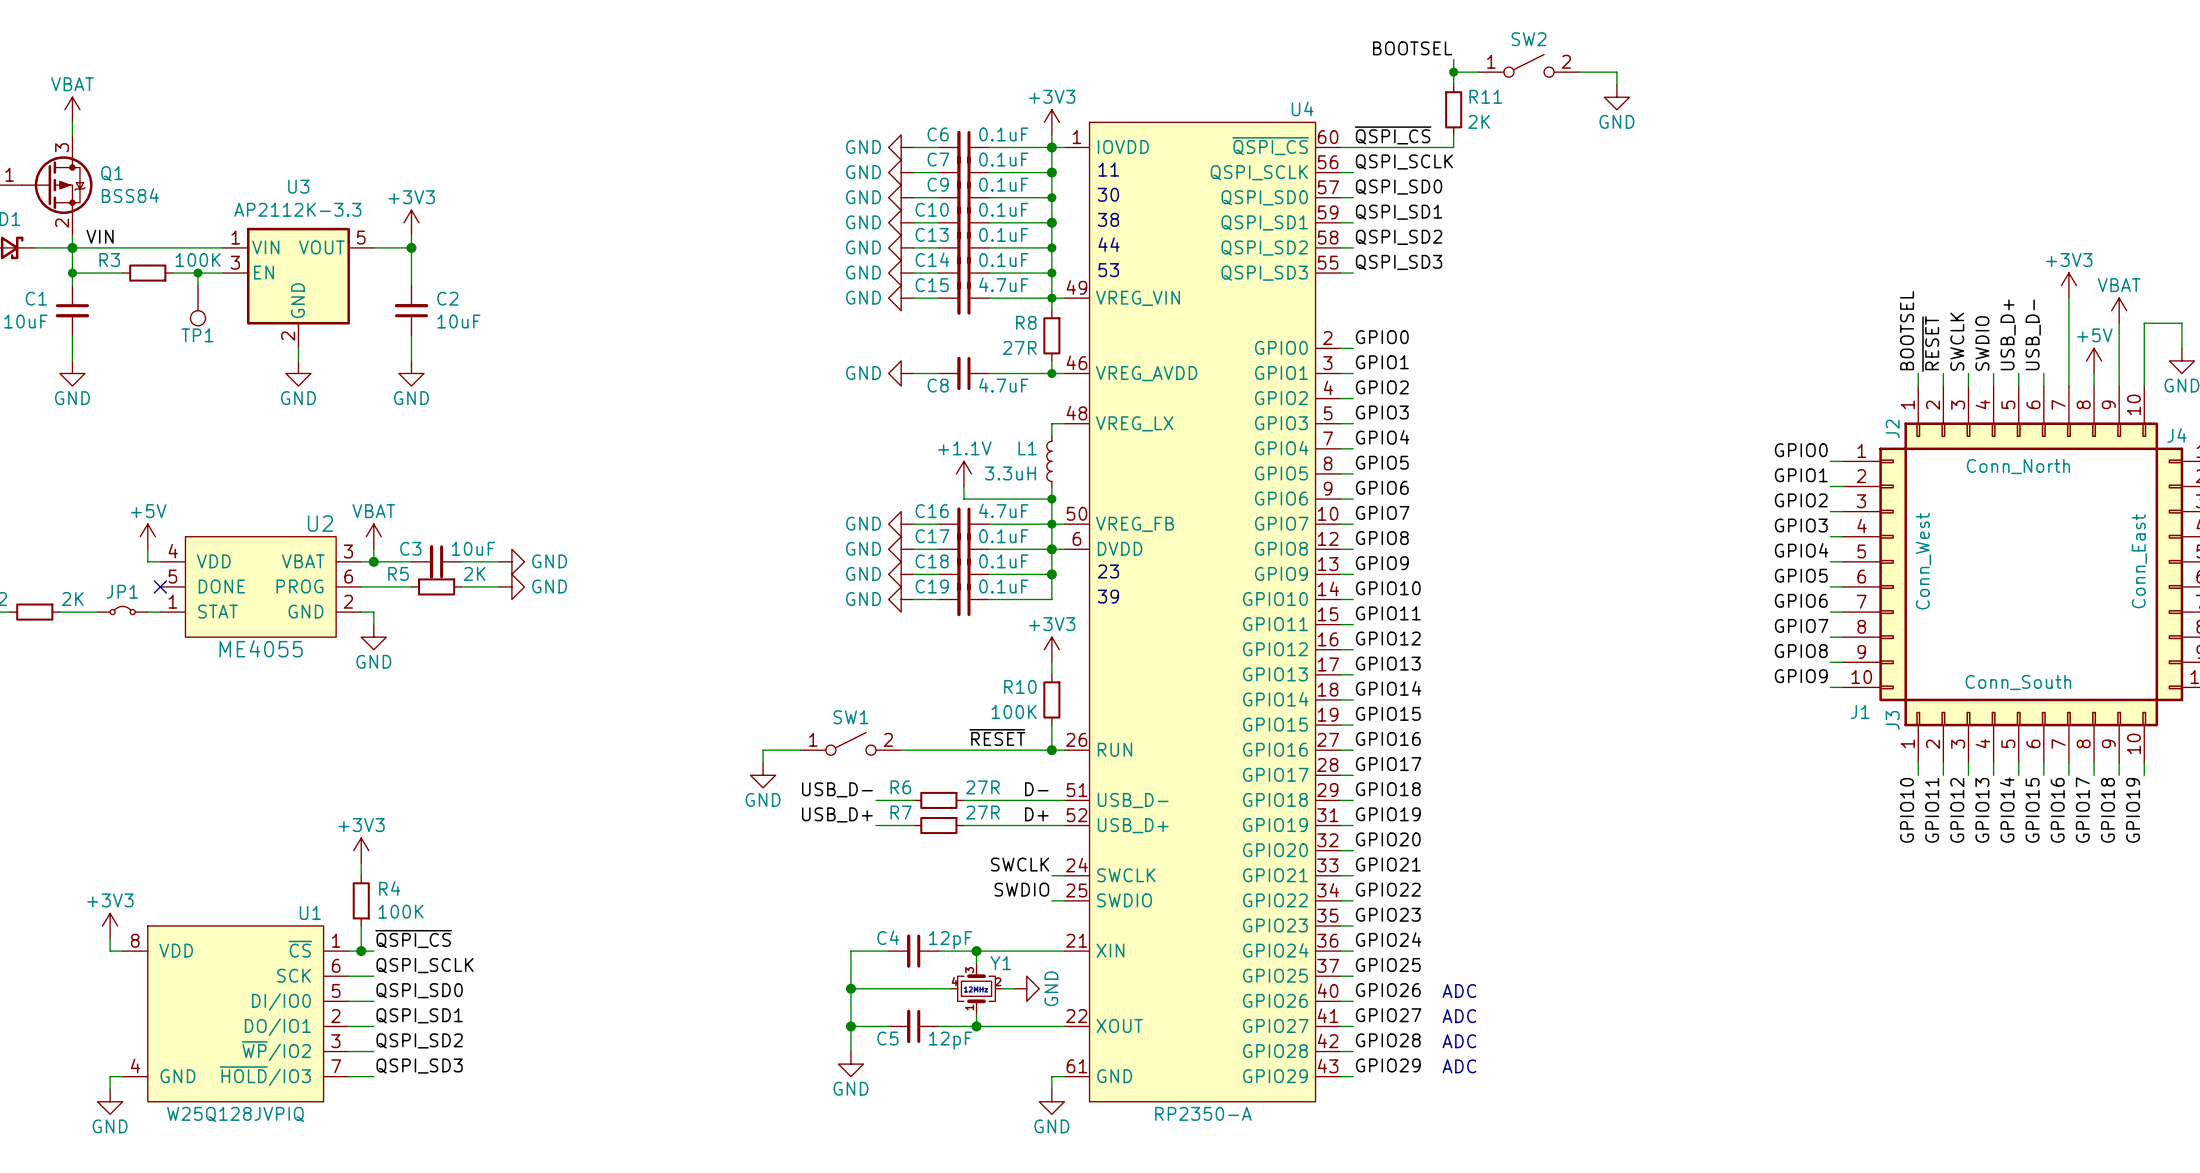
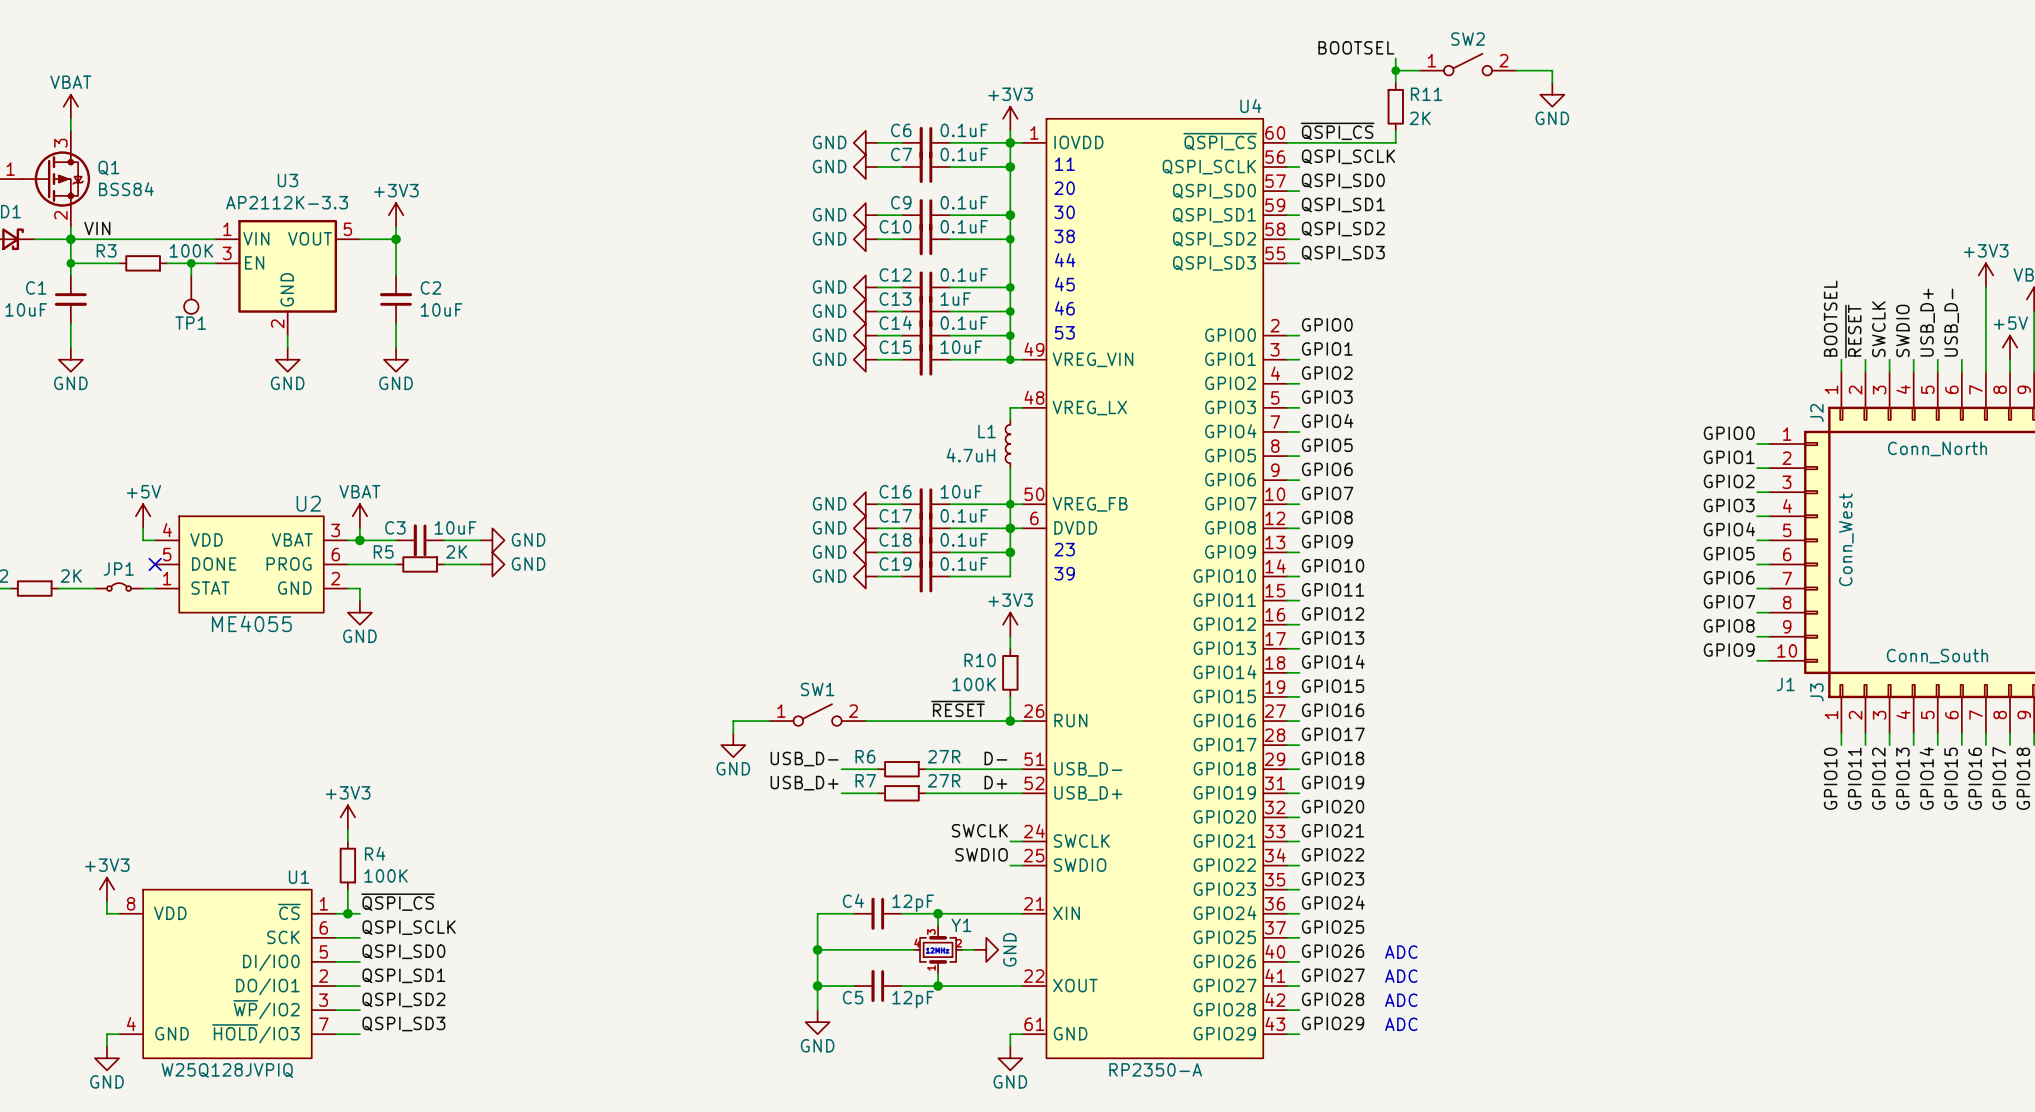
U4 symbol: [1064, 122, 1341, 1102] -> [1022, 118, 1288, 1059]
text: 30 (1108, 194) -> 20 (1064, 188)
power symbol: GND (901, 197) -> none
wire: (913, 197) (938, 197) -> (877, 335) (901, 335)
C9: 0.1uF (963, 197) -> none
wire: (989, 197) (1051, 197) -> (950, 335) (1010, 335)
junction: (1051, 197) -> none
C10 name: C10 (932, 209) -> C9 (901, 202)
text: 38 (1108, 219) -> 30 (1064, 212)
C13 name: C13 (932, 234) -> C10 (895, 226)
text: 44 (1109, 244) -> 38 (1064, 236)
text: 53 (1108, 270) -> 44 (1065, 260)
power symbol: GND (901, 273) -> none
wire: (913, 273) (938, 273) -> (877, 311) (901, 311)
C14 position: (963, 273) -> (926, 335)
wire: (989, 273) (1051, 273) -> (950, 311) (1010, 311)
junction: (1051, 273) -> none
C15 value: 4.7uF (1003, 284) -> 0.1uF (964, 274)
C15 name: C15 (932, 285) -> C12 (895, 274)
text: none -> 45 (1064, 284)
wire: (1051, 298) (1064, 298) -> none
wire: none -> (1010, 299) (1010, 347)
text: none -> 46 (1064, 308)
power symbol: none -> GND (865, 311)
C13: none -> 1uF (926, 311)
junction: none -> (1010, 311)
R8: 27R (1051, 335) -> none
text: none -> 53 (1064, 332)
power symbol: none -> GND (865, 335)
junction: none -> (1010, 335)
C8 name: C8 (938, 385) -> C15 (895, 347)
C8 value: 4.7uF (1003, 385) -> 10uF (961, 347)
power symbol: +1.1V (963, 473) -> none
L1 value: 3.3uH (1010, 473) -> 4.7uH (970, 455)
wire: (963, 486) (963, 499) (1051, 499) -> none
junction: (1051, 499) -> none
C16 value: 4.7uF (1003, 510) -> 10uF (961, 491)

